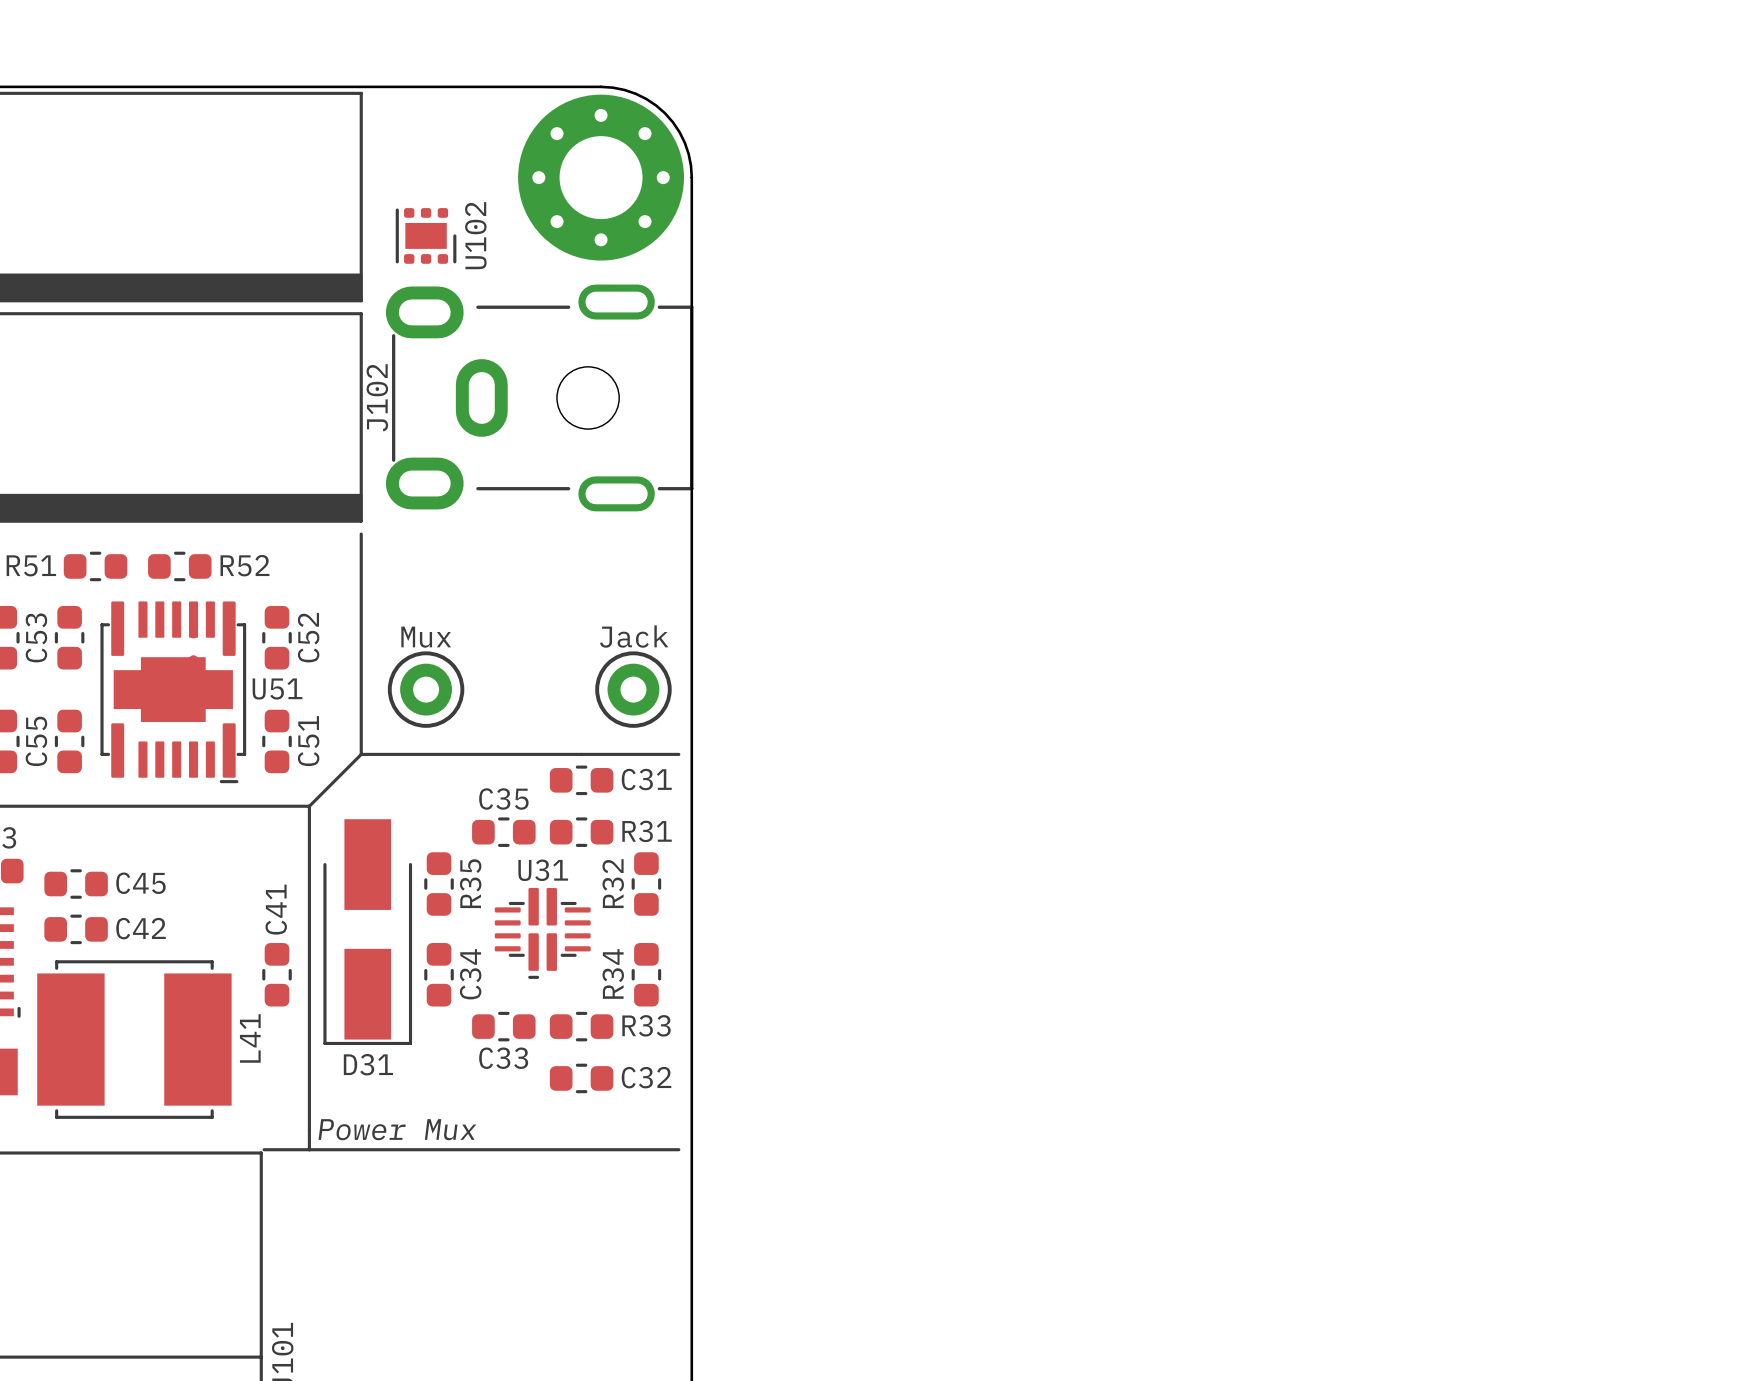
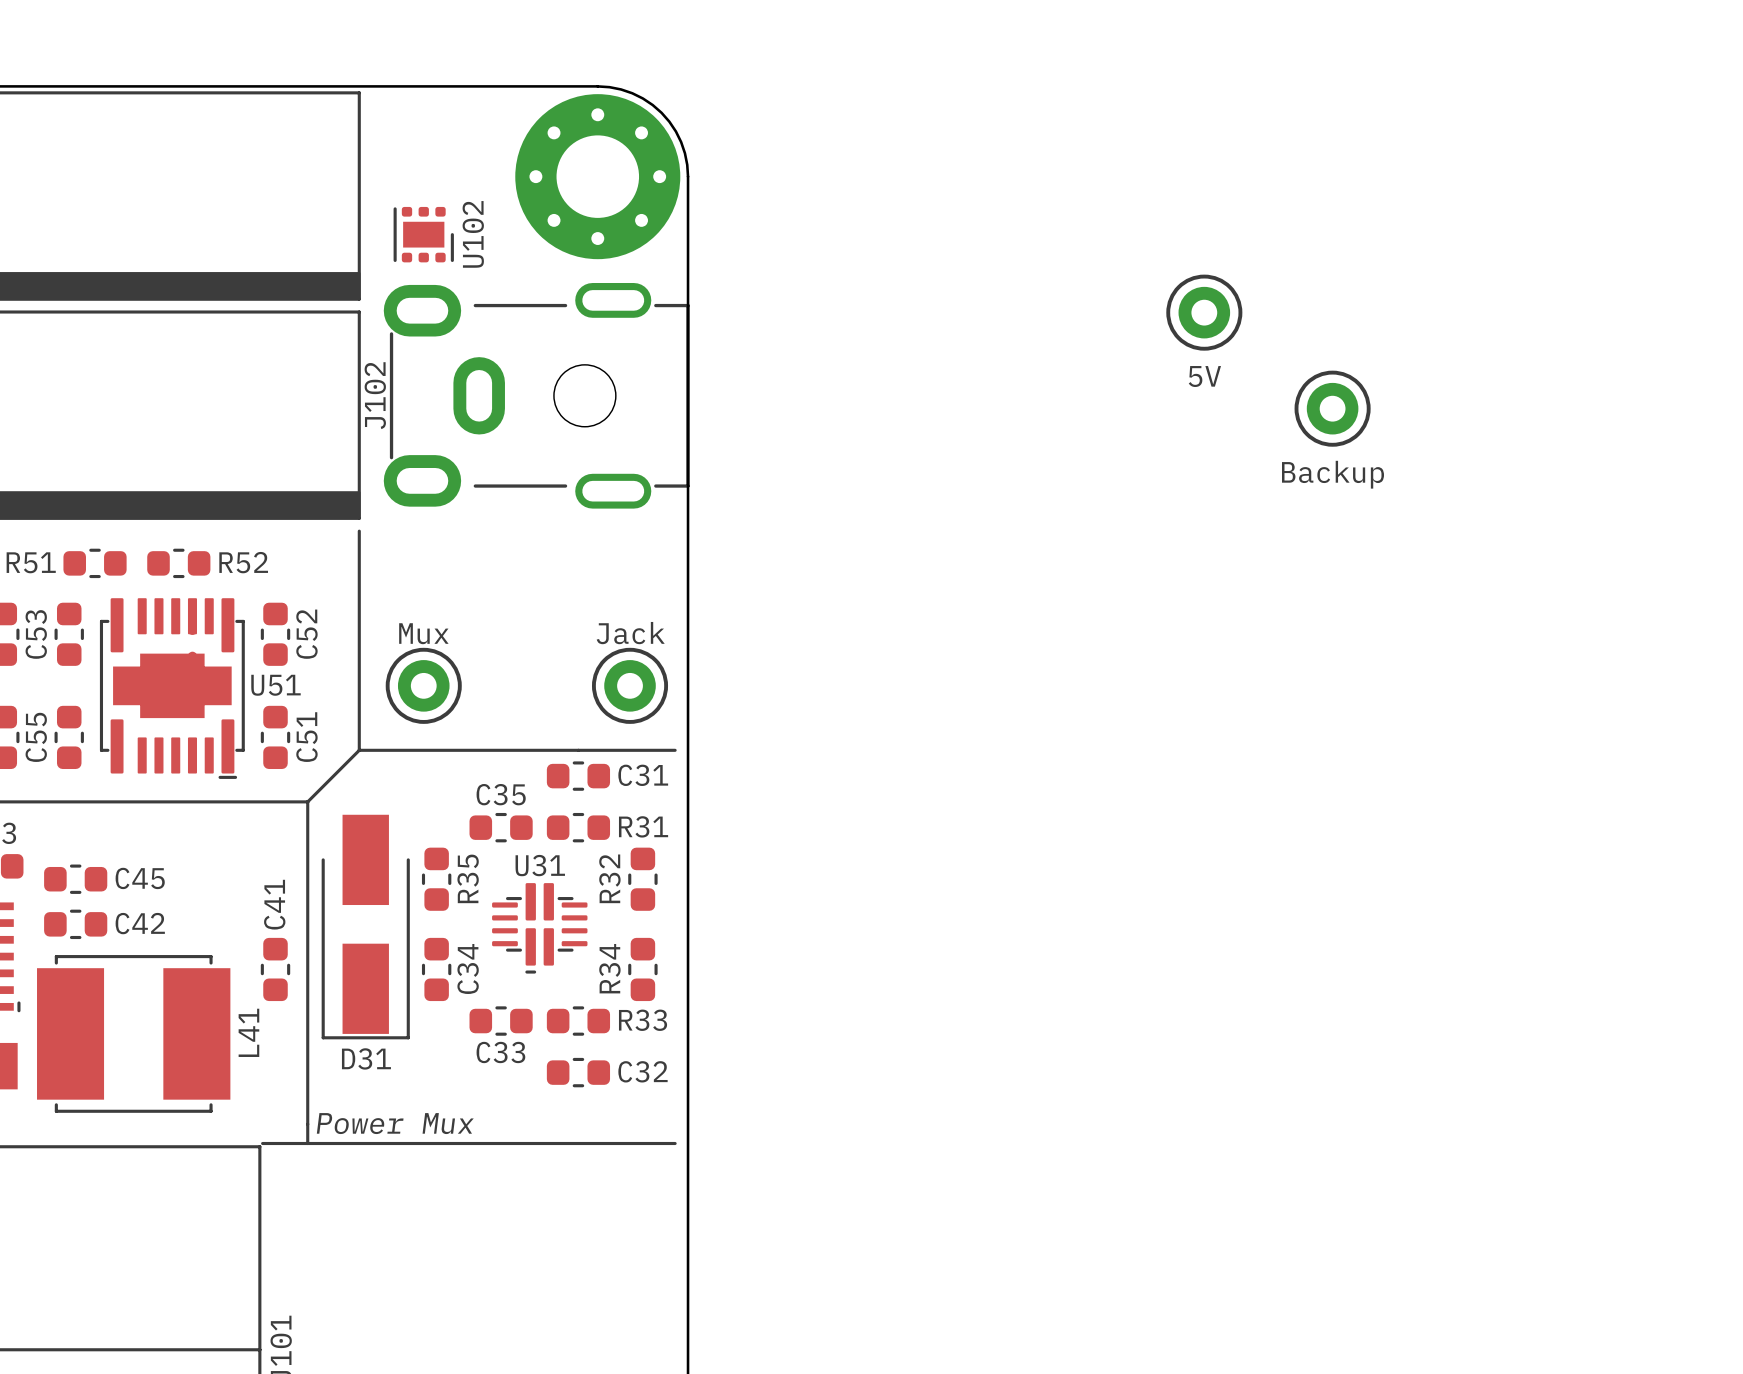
part: none -> 5V (1204, 312)
part: none -> Backup (1332, 408)

